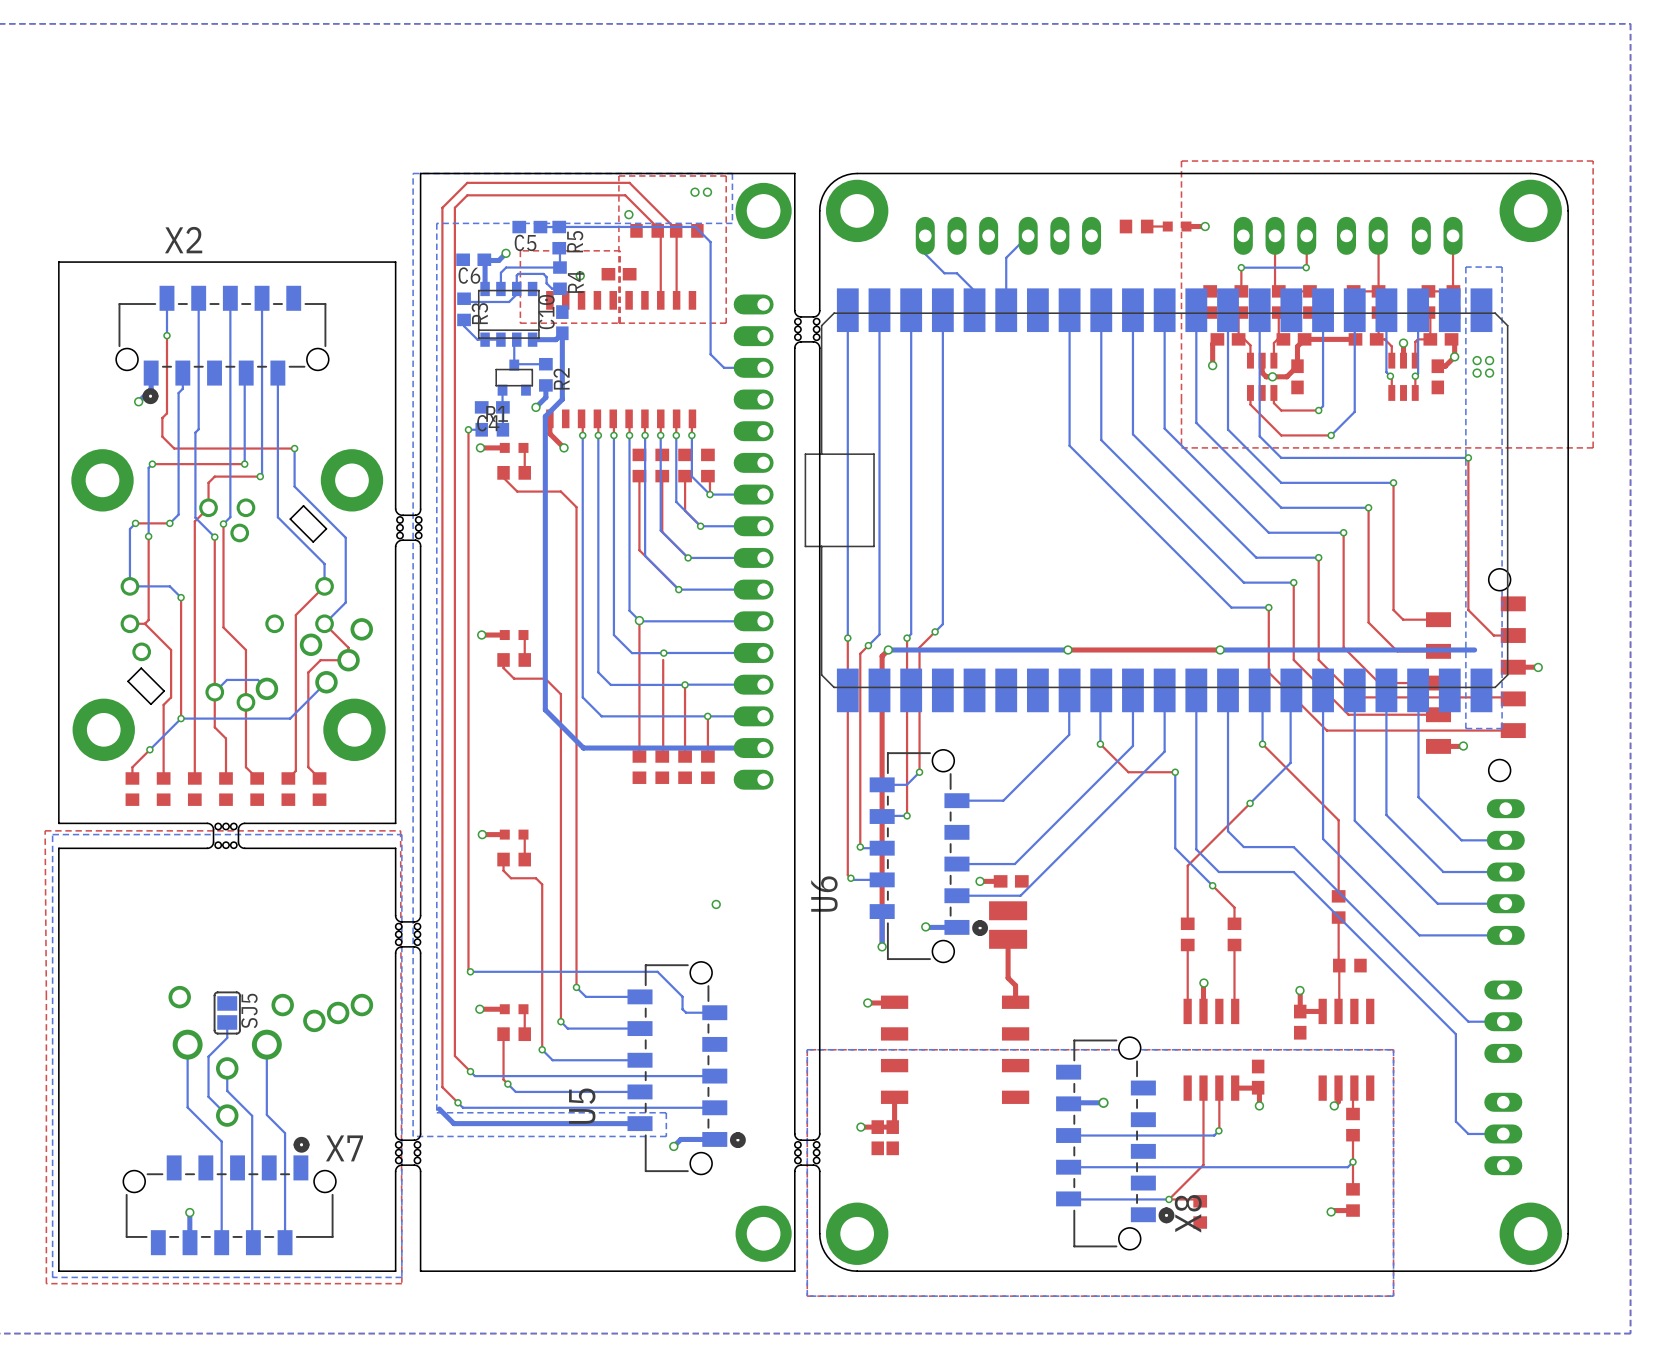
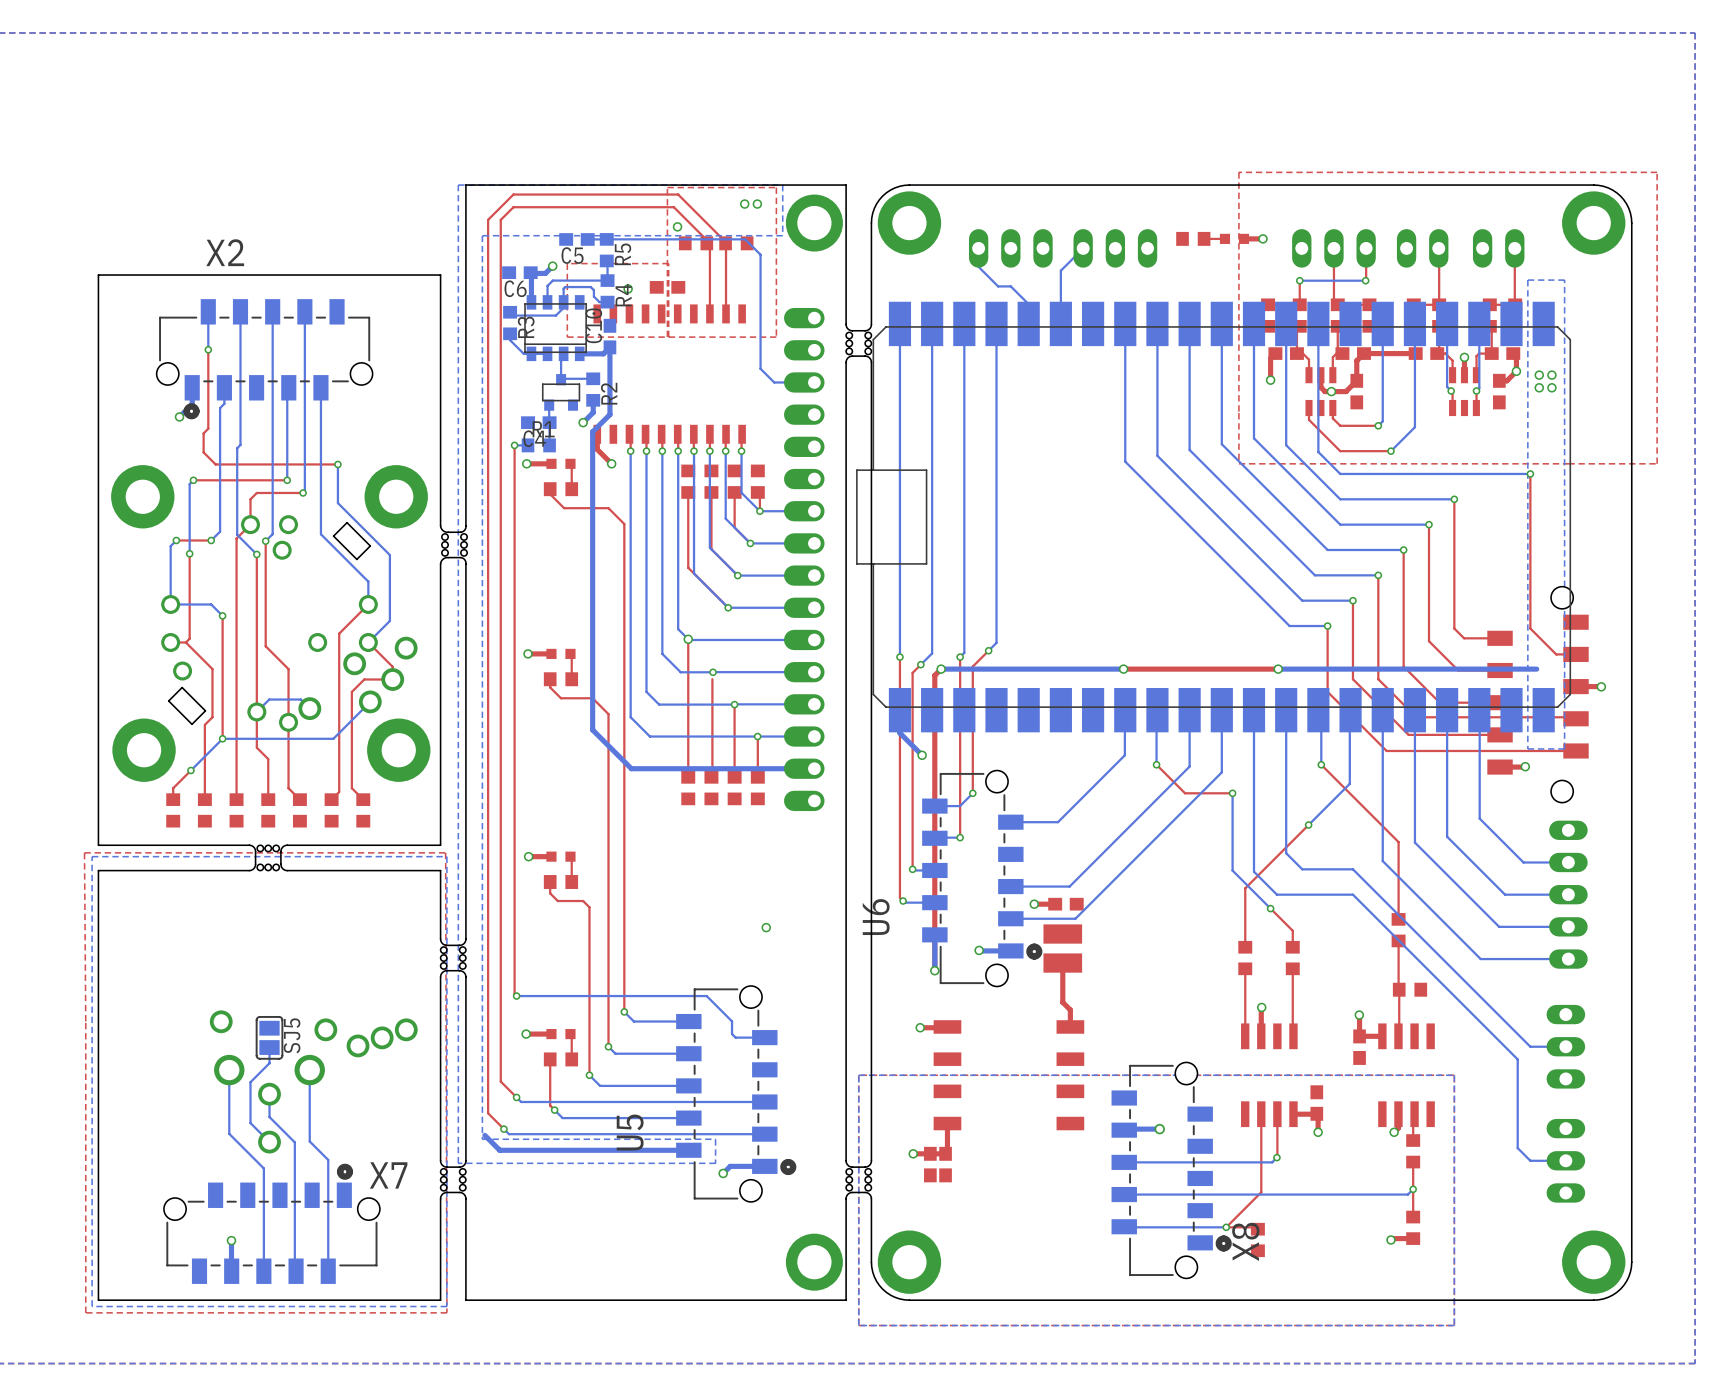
bottom track: none -> (899, 710) (899, 733) (922, 755)
via: none -> (922, 755)

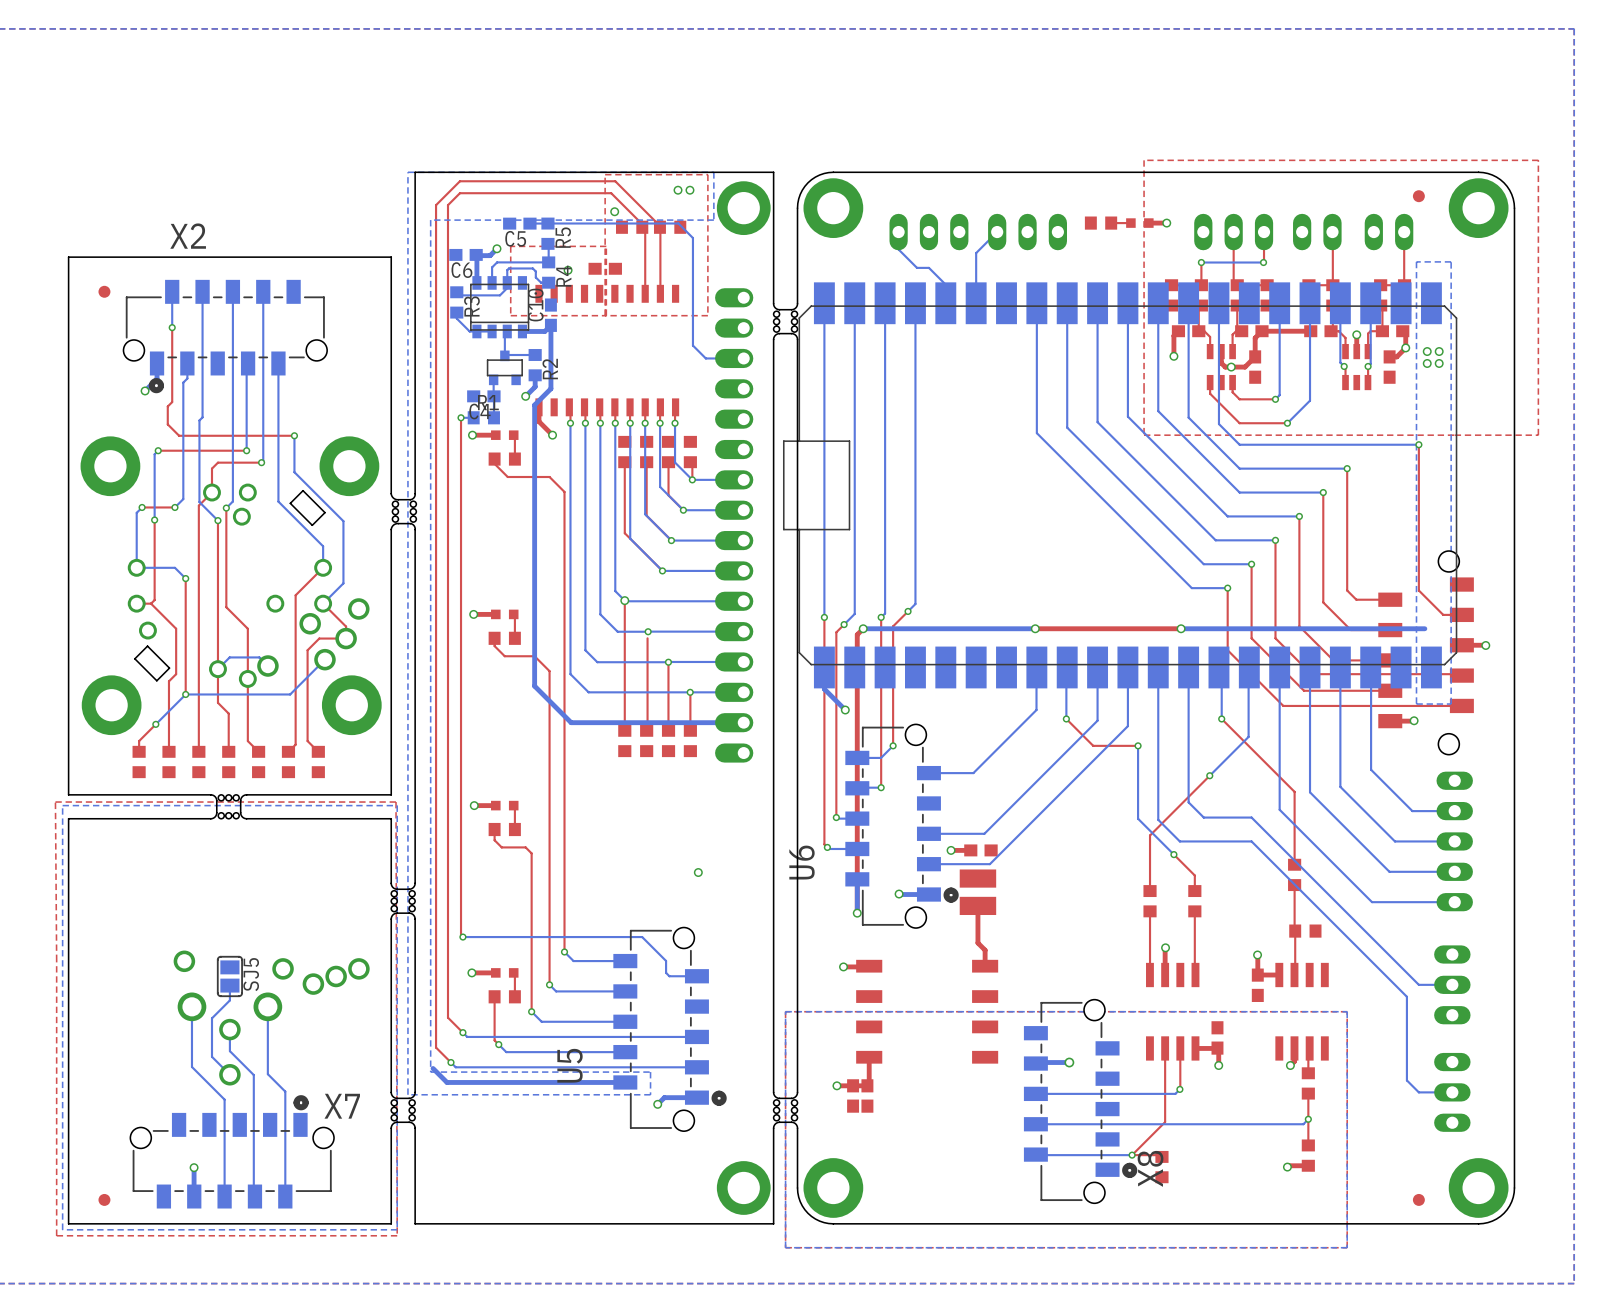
part: none -> (1418, 196)
part: none -> (104, 291)
part: none -> (104, 1199)
part: none -> (1418, 1199)

